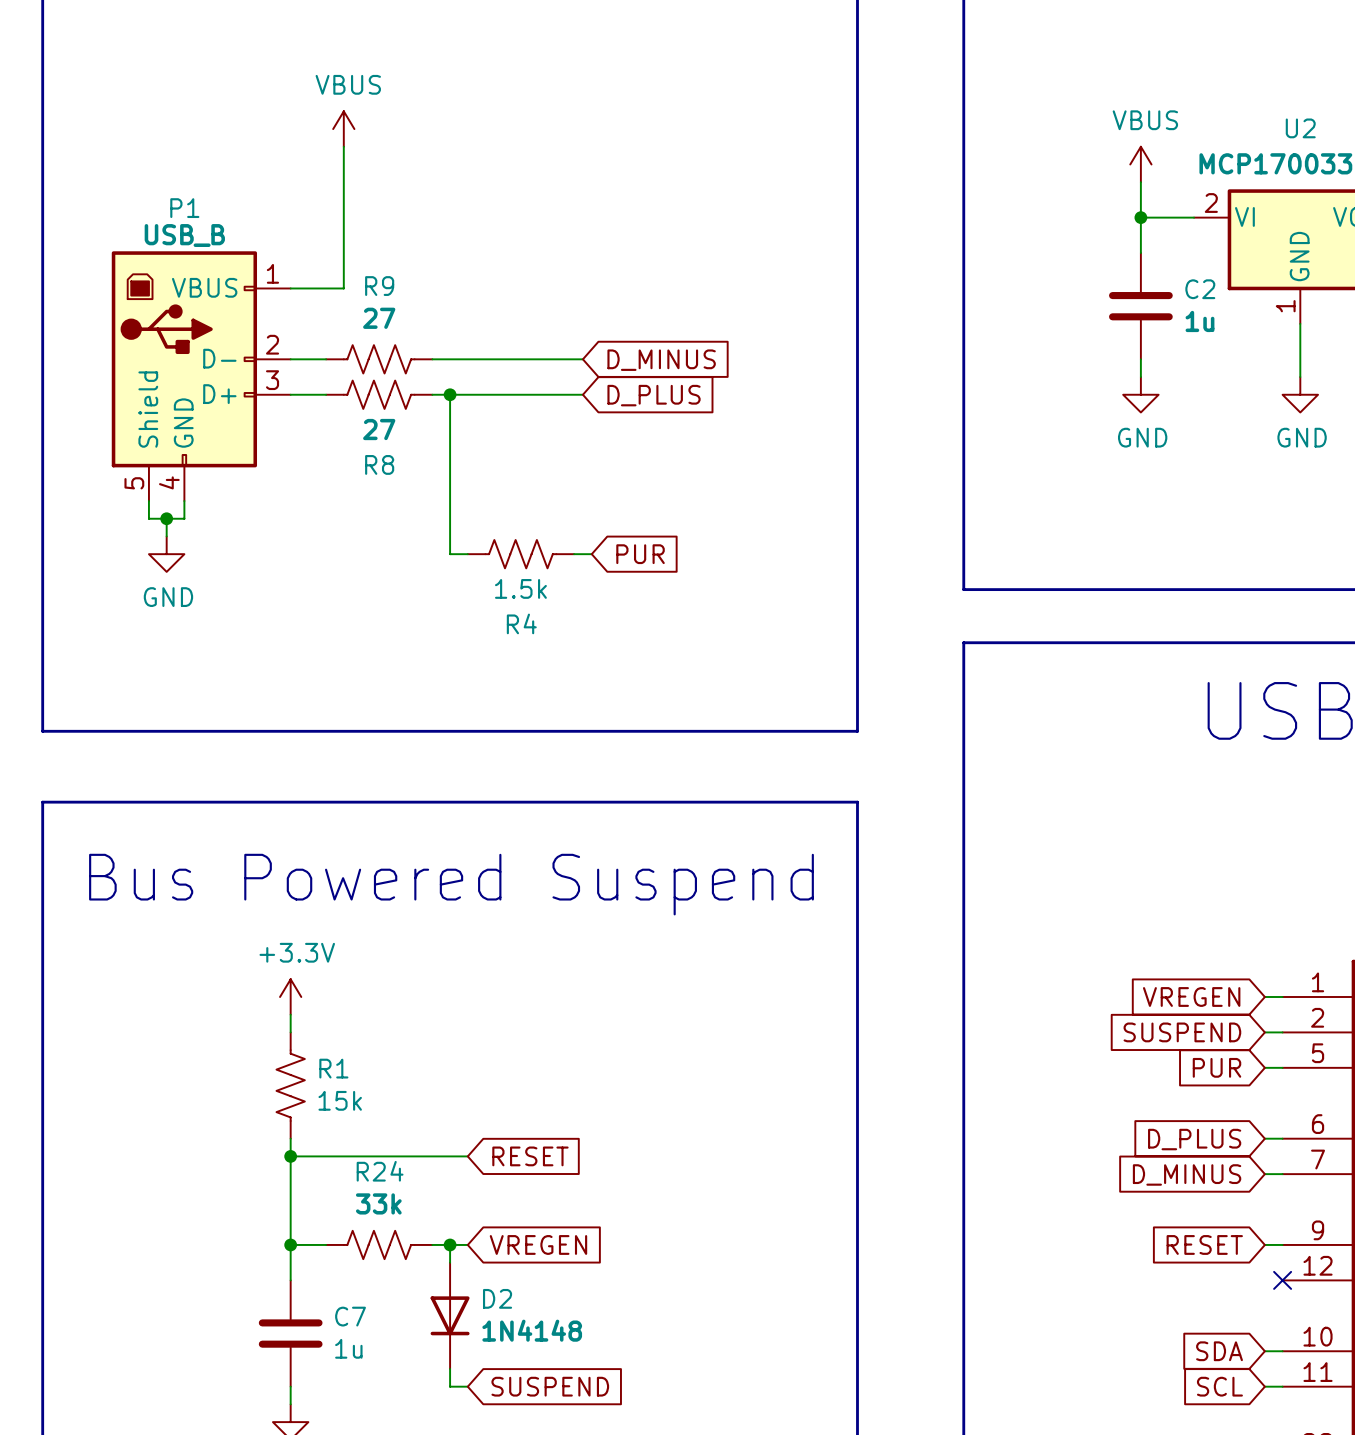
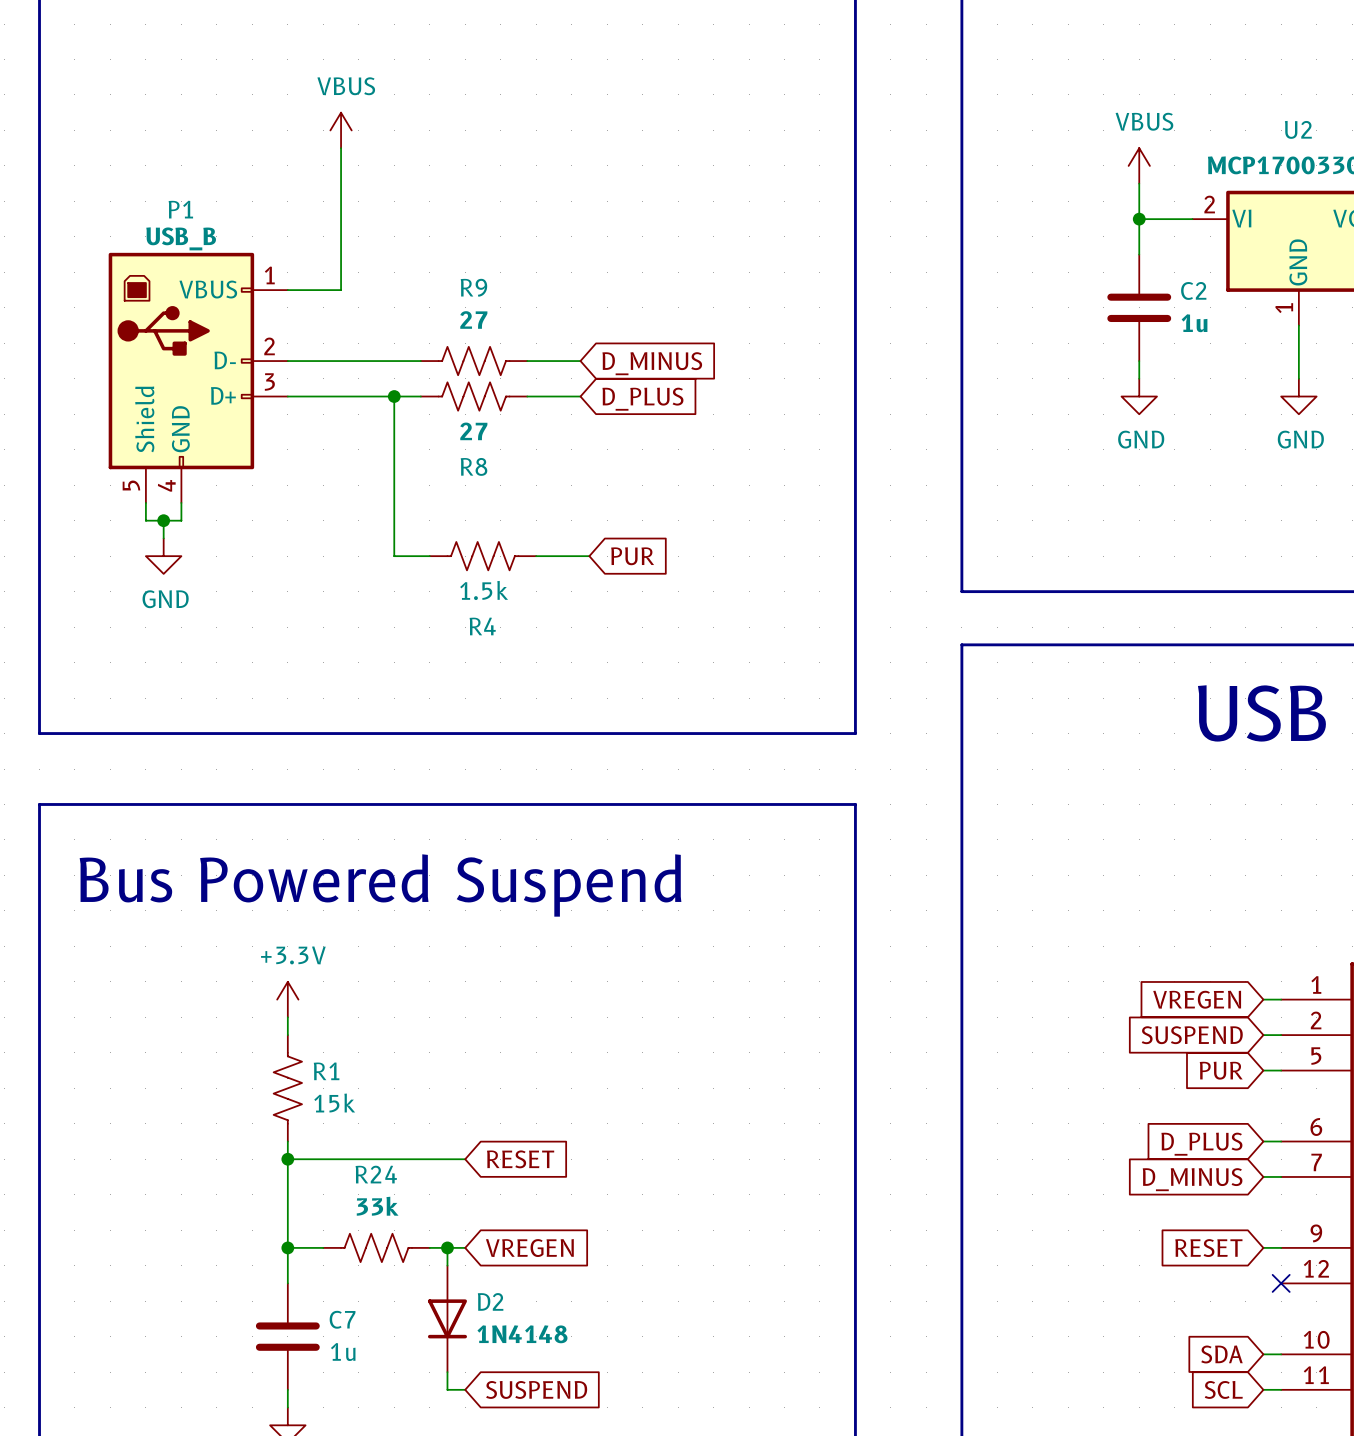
R9 position: (379, 359) -> (474, 361)
wire: (432, 359) (529, 359) -> (323, 361) (420, 361)
R8 position: (379, 394) -> (474, 396)
wire: none -> (394, 396) (394, 556) (429, 556)
wire: (432, 394) (529, 394) -> (323, 396) (420, 396)
wire: (450, 394) (450, 554) (467, 554) -> none
junction position: (450, 394) -> (394, 396)
R4 position: (520, 554) -> (482, 556)

